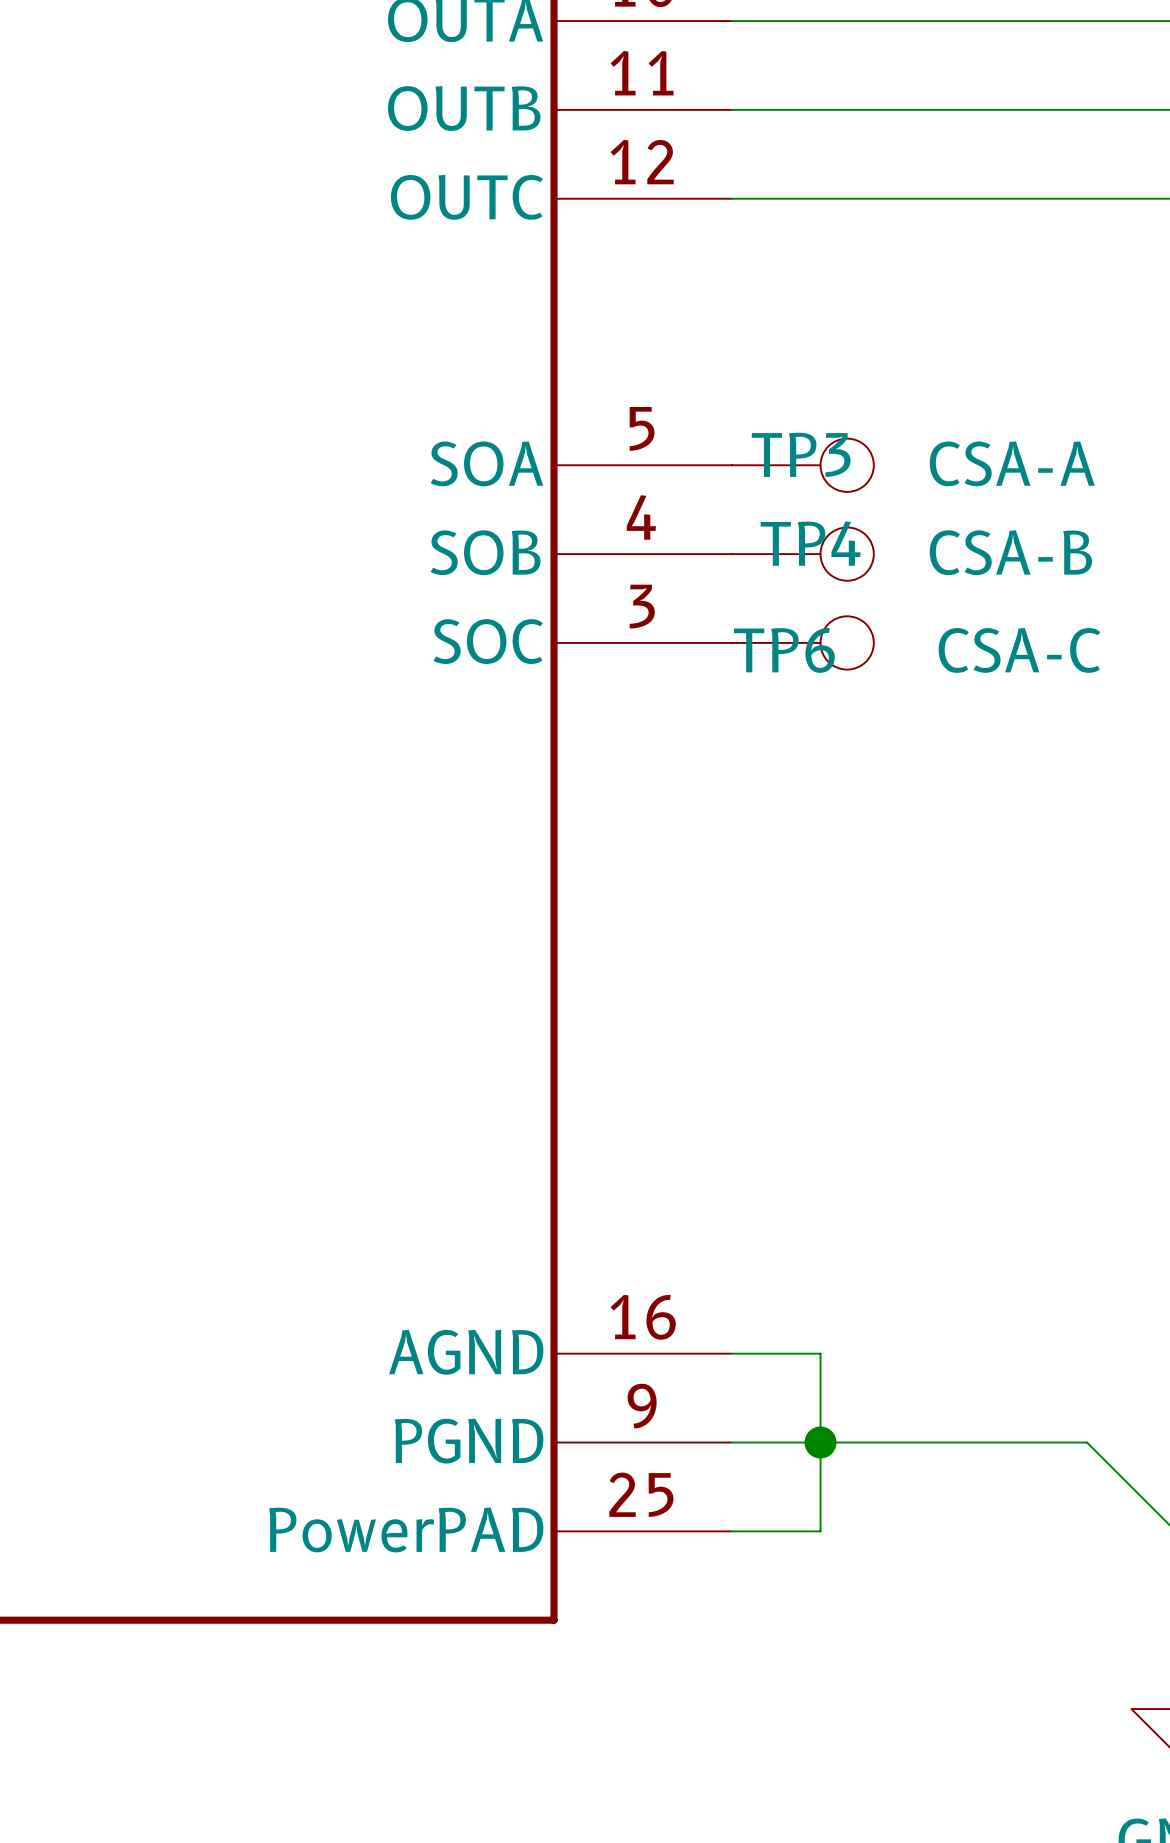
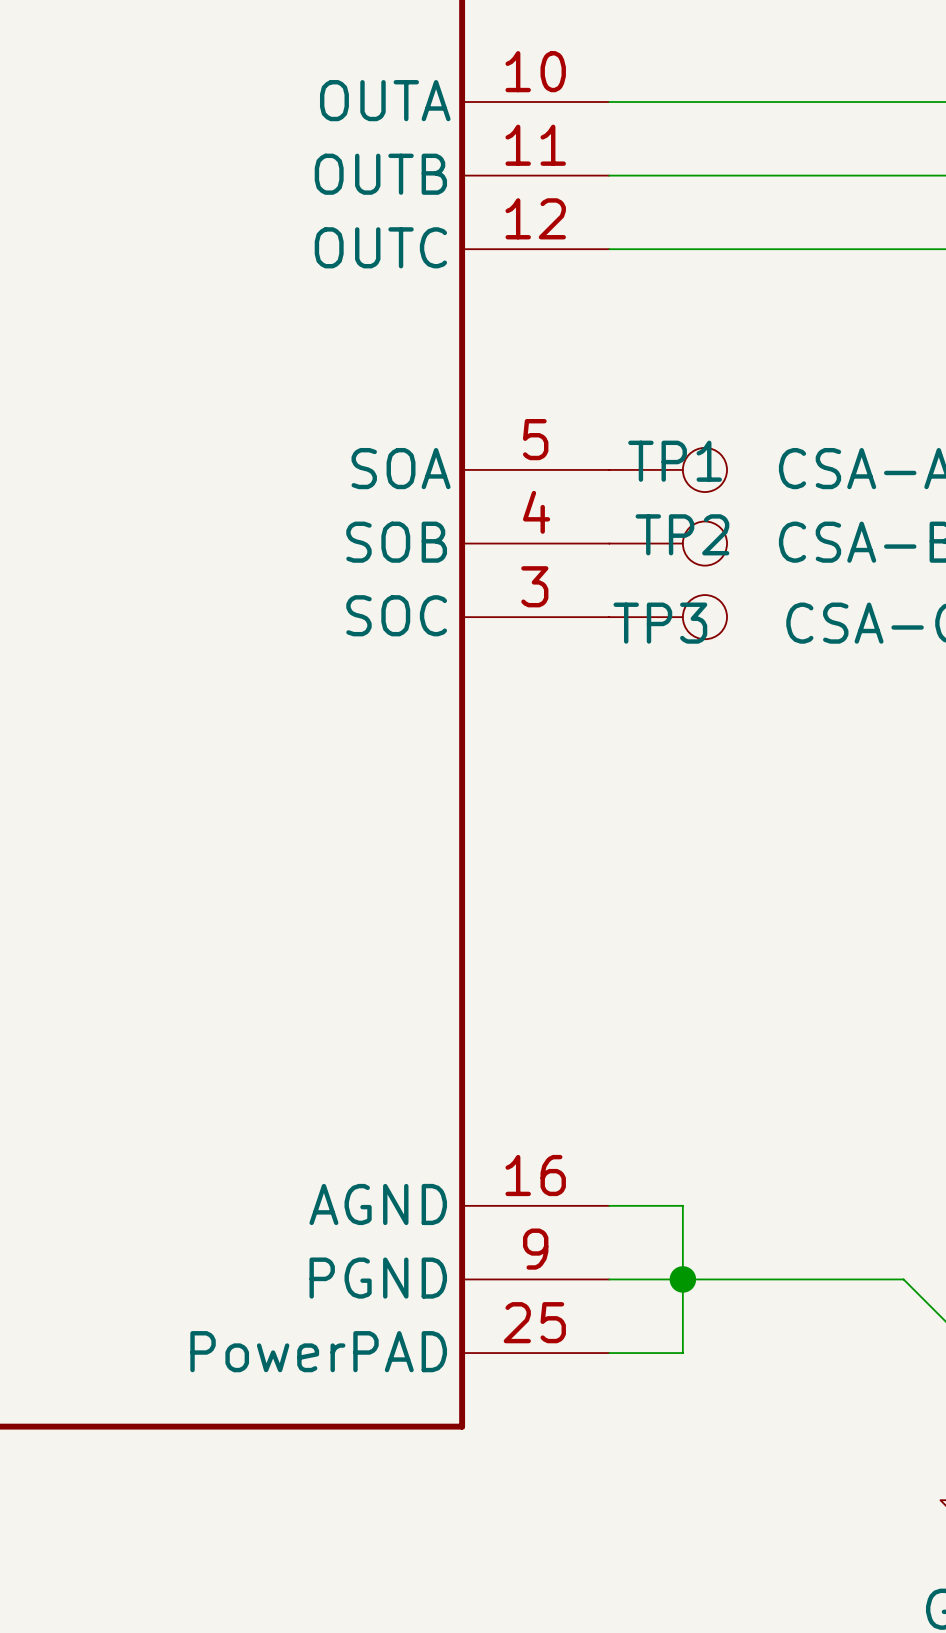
TP3 name: TP3 (801, 454) -> TP1 (675, 461)
TP4 name: TP4 (810, 543) -> TP2 (682, 534)
TP6 name: TP6 (784, 650) -> TP3 (660, 623)

